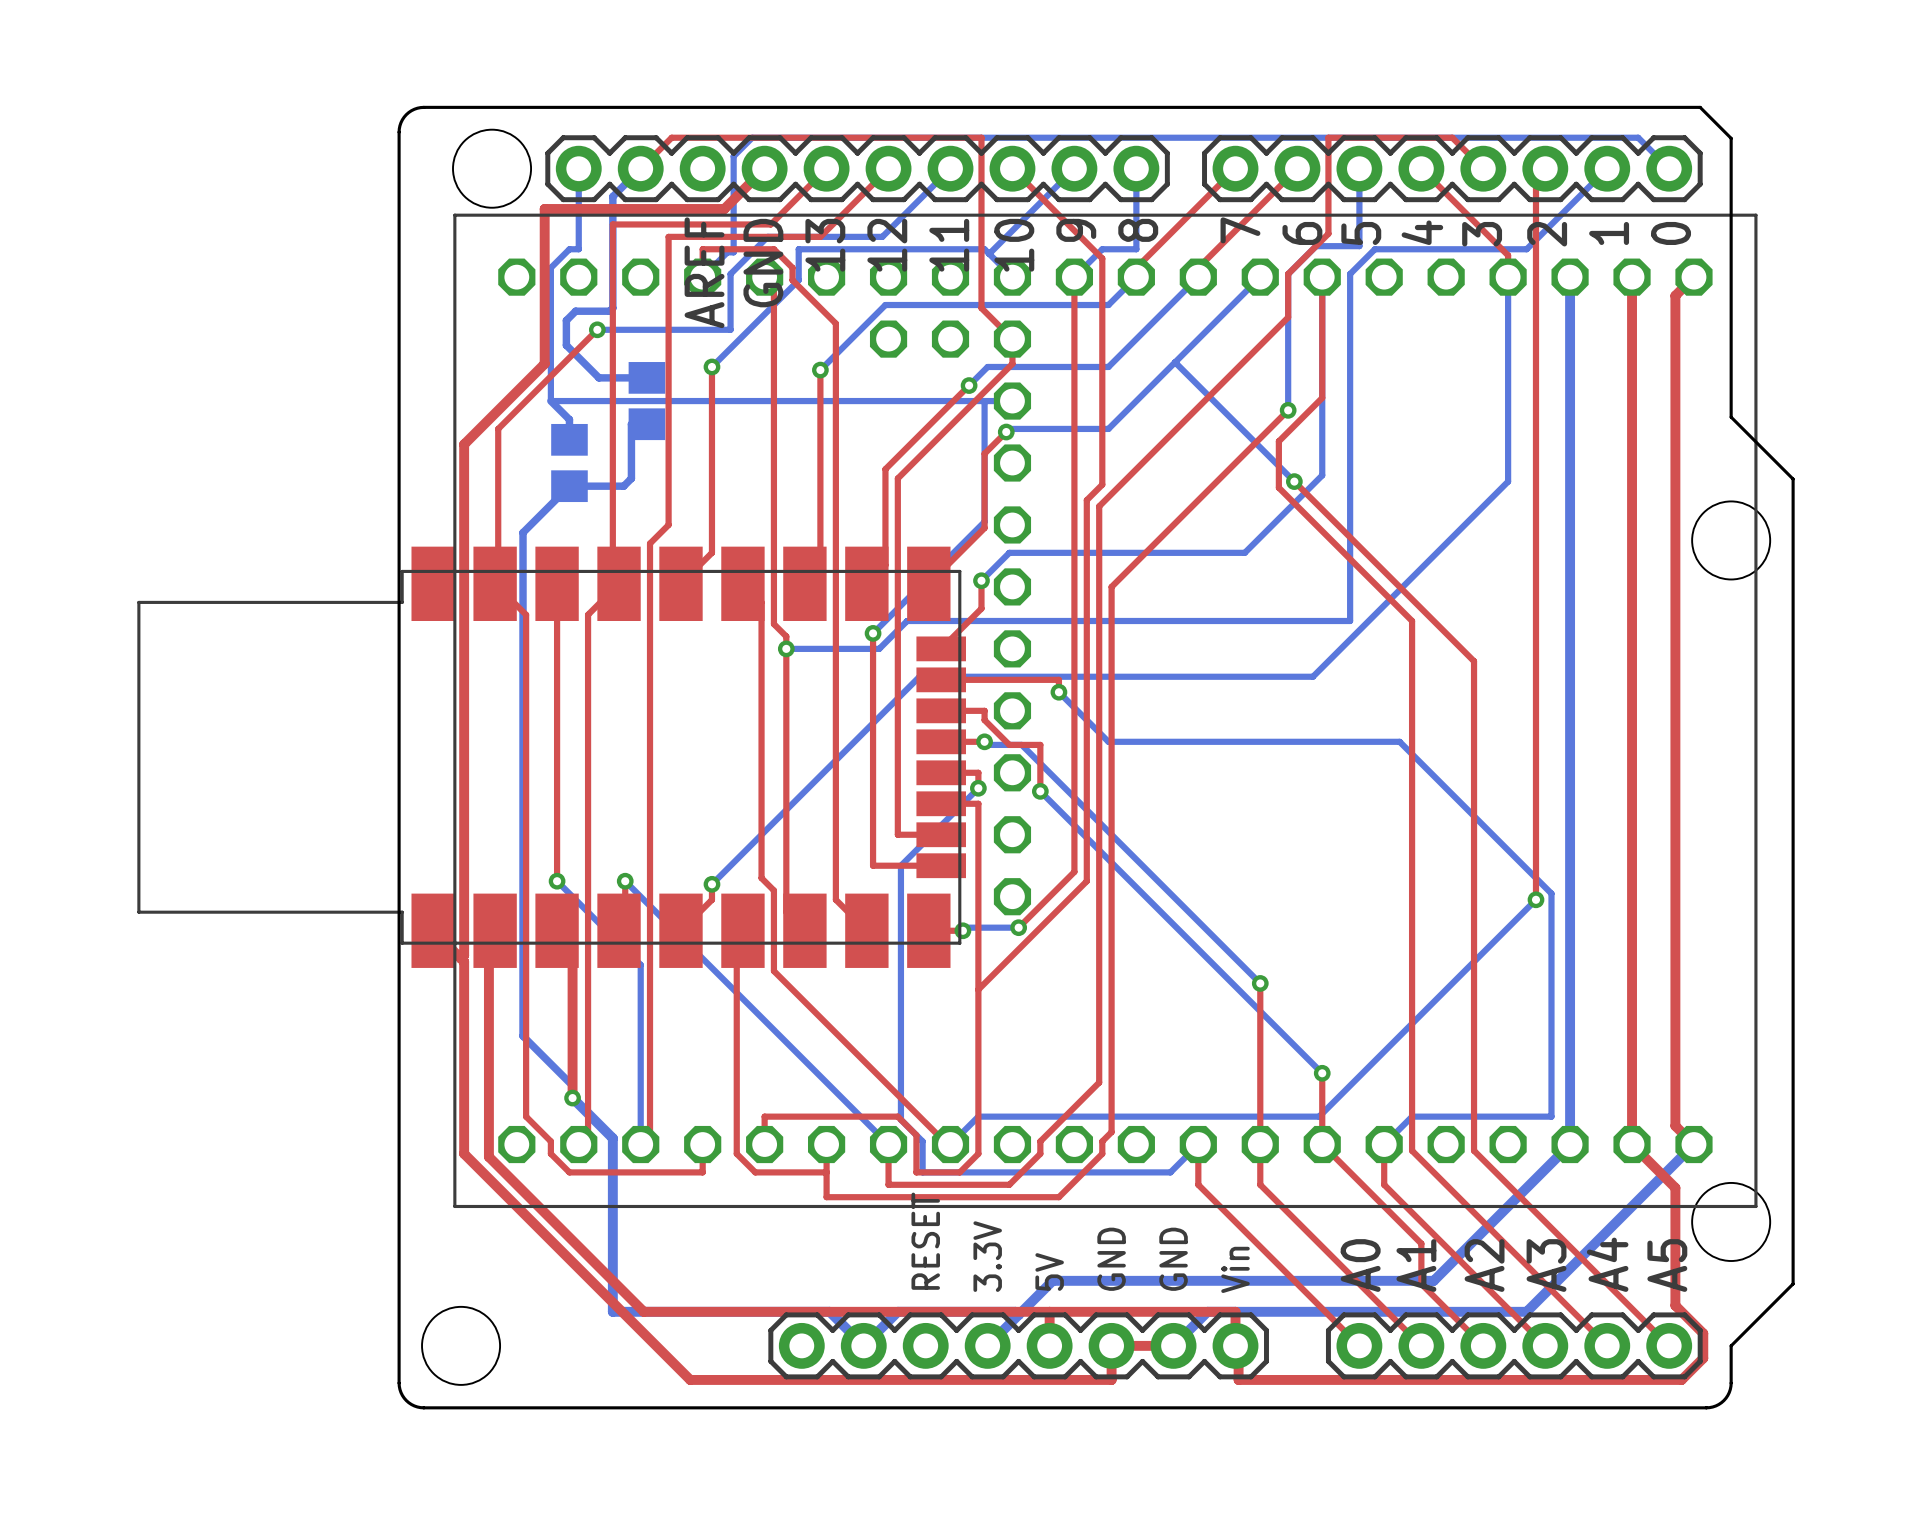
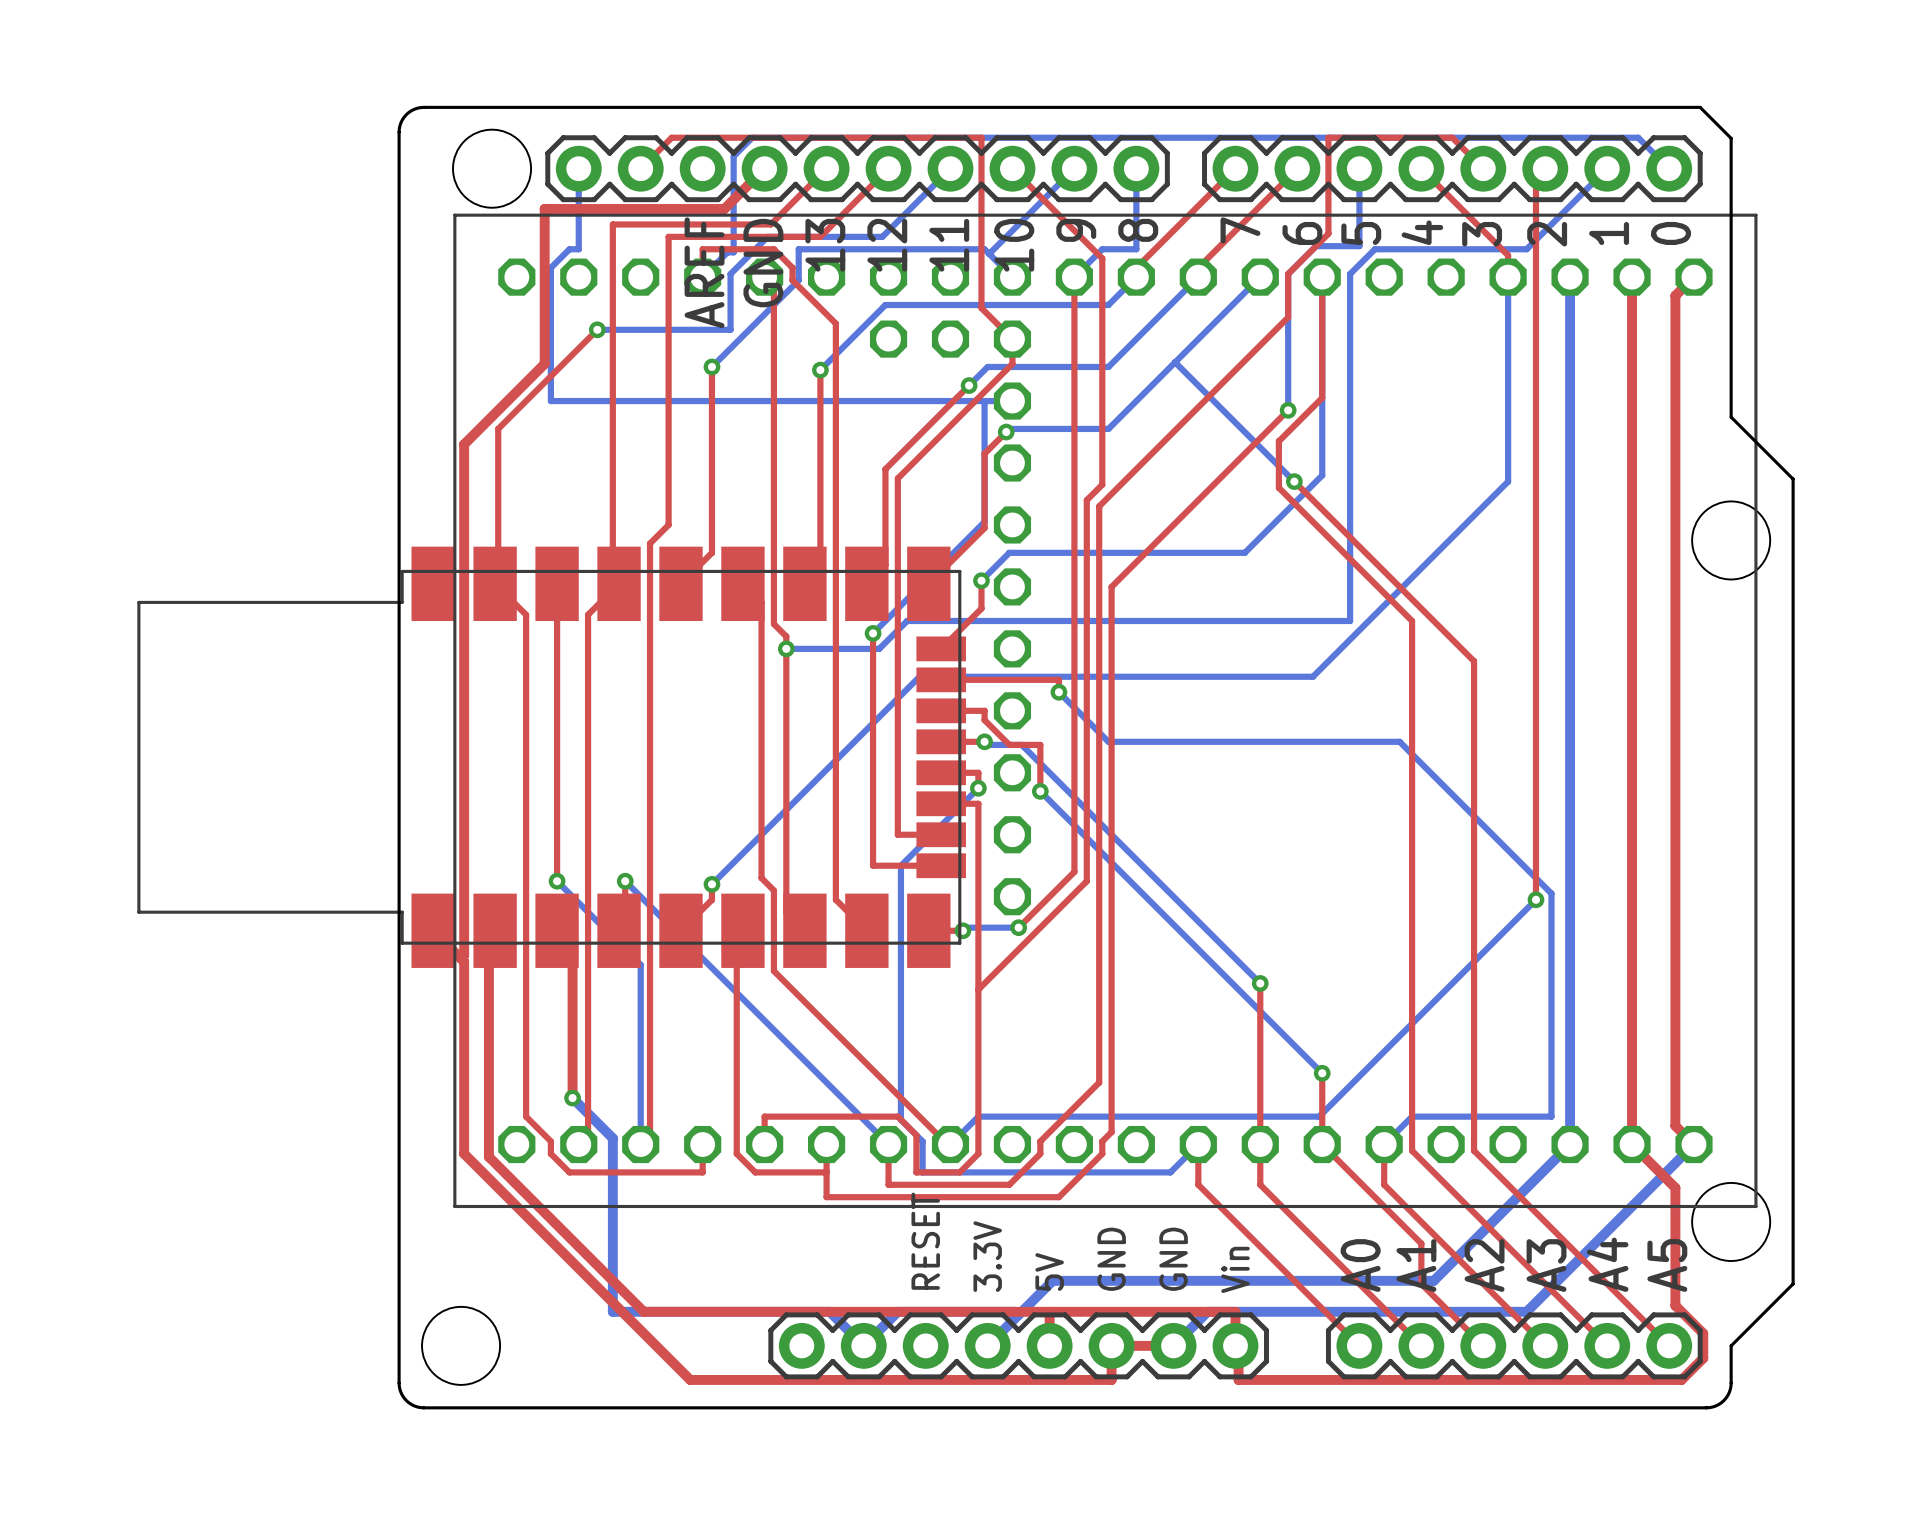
bottom track: (640, 168) (612, 196) (612, 308) (609, 311) (575, 311) (566, 320) (566, 345) (598, 377) (646, 377) -> none
bottom track: (550, 401) (569, 419) (569, 439) -> none
part: (646, 401) -> none
bottom track: (646, 424) (631, 424) (631, 478) (623, 486) (569, 486) (523, 532) (523, 1036) (572, 1085) (572, 1098) -> none
part: (569, 463) -> none

